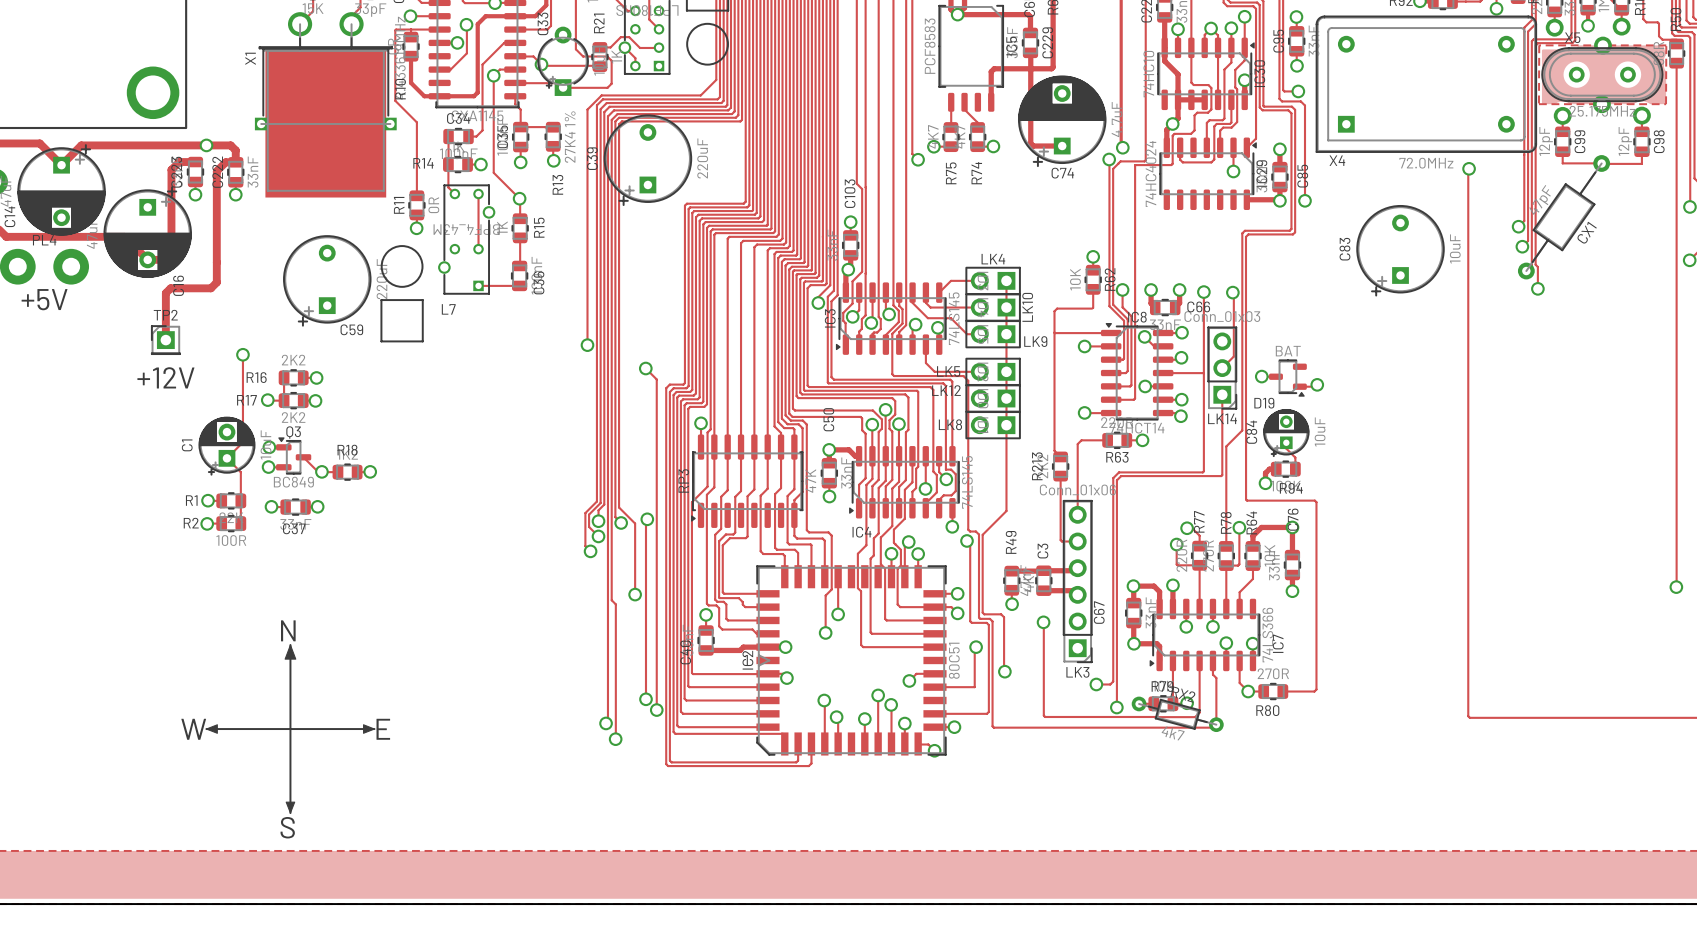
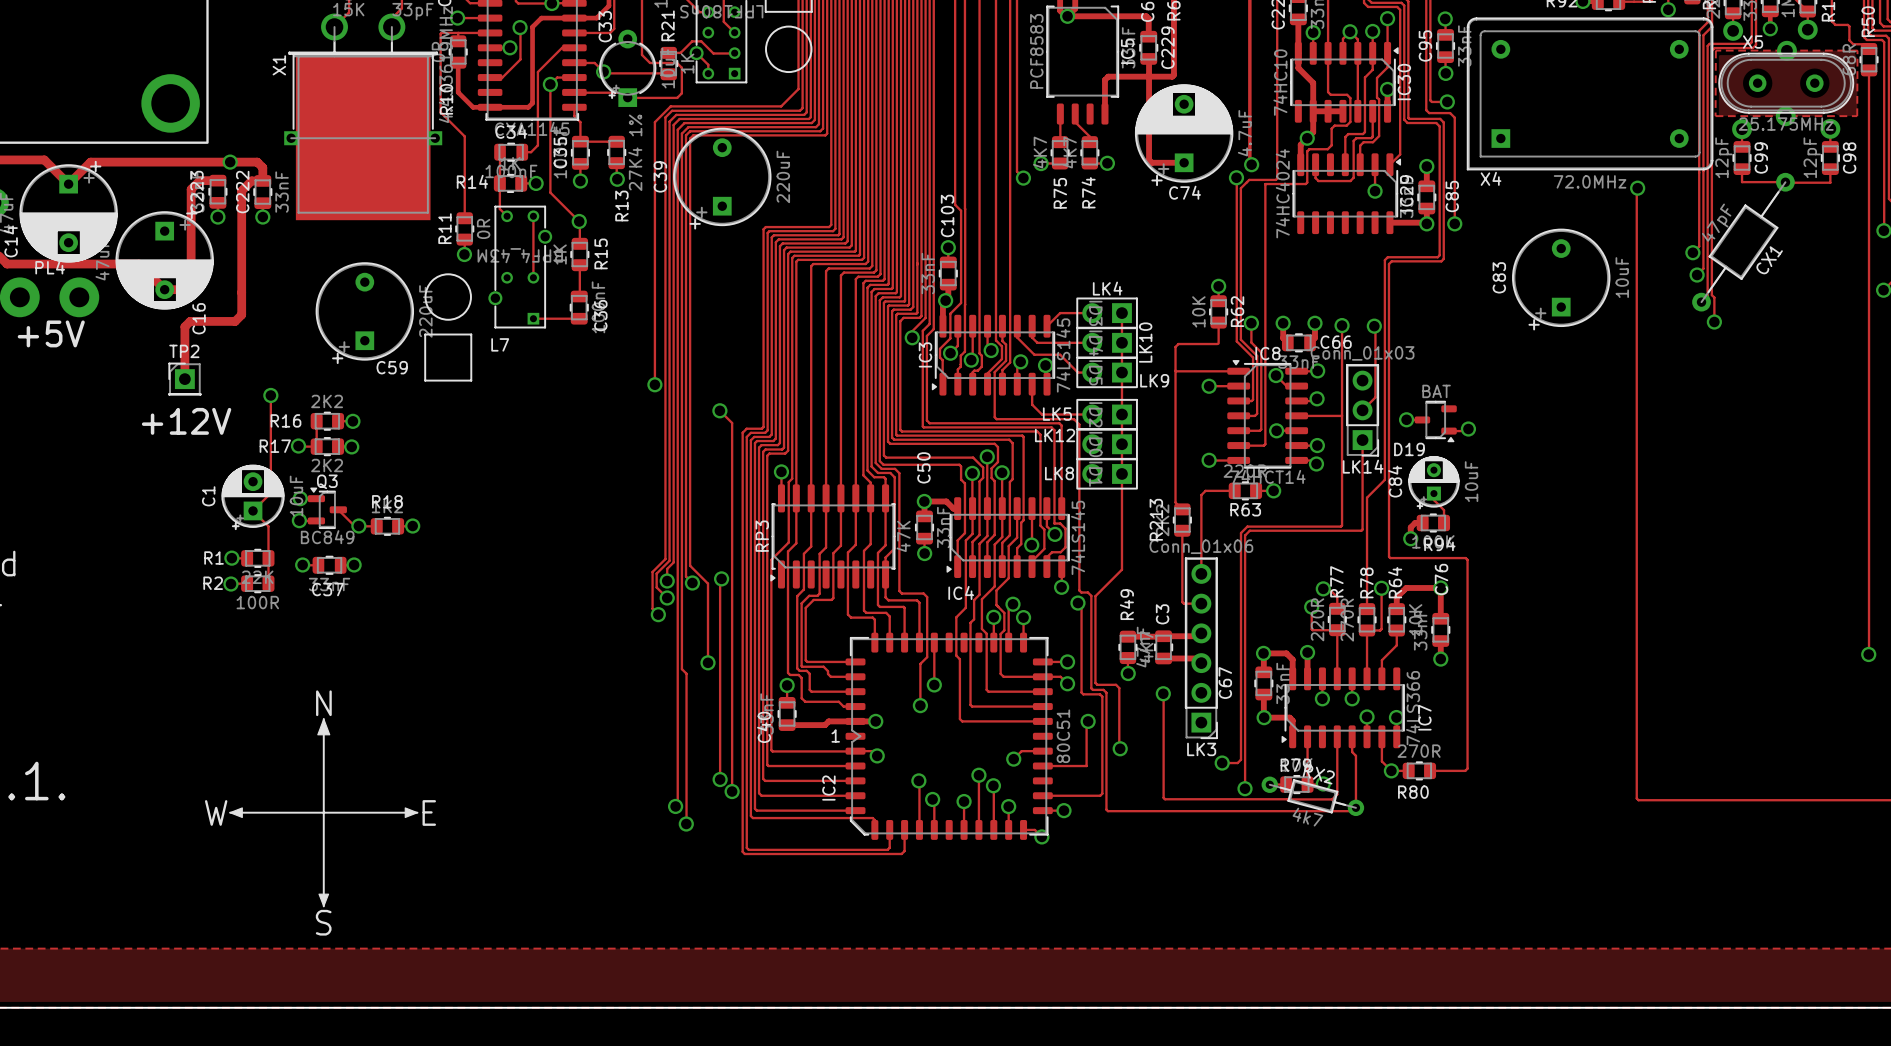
IC2 footprint: [756, 565, 947, 756] -> [845, 632, 1053, 840]
IC2 name position: IC2 (747, 660) -> IC2 (828, 788)

